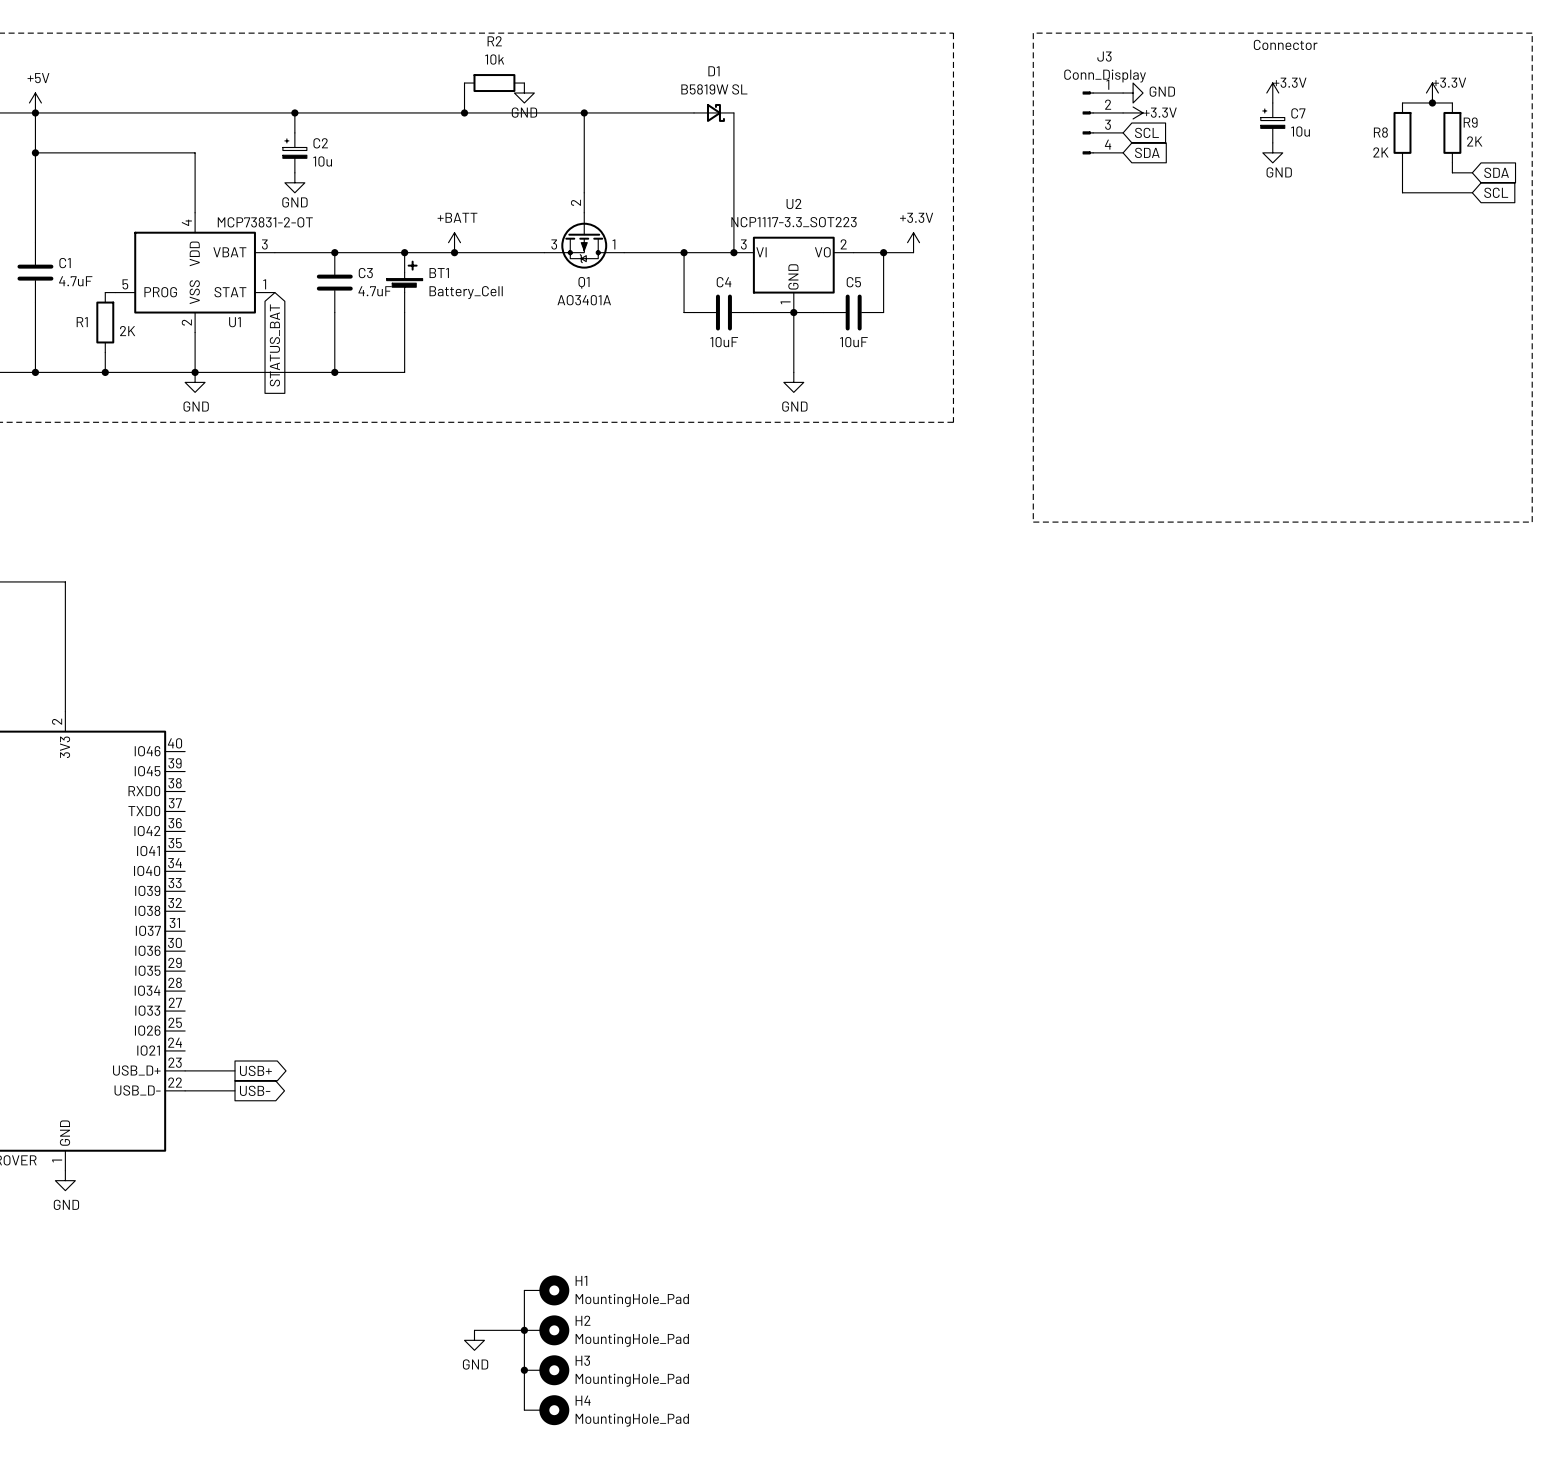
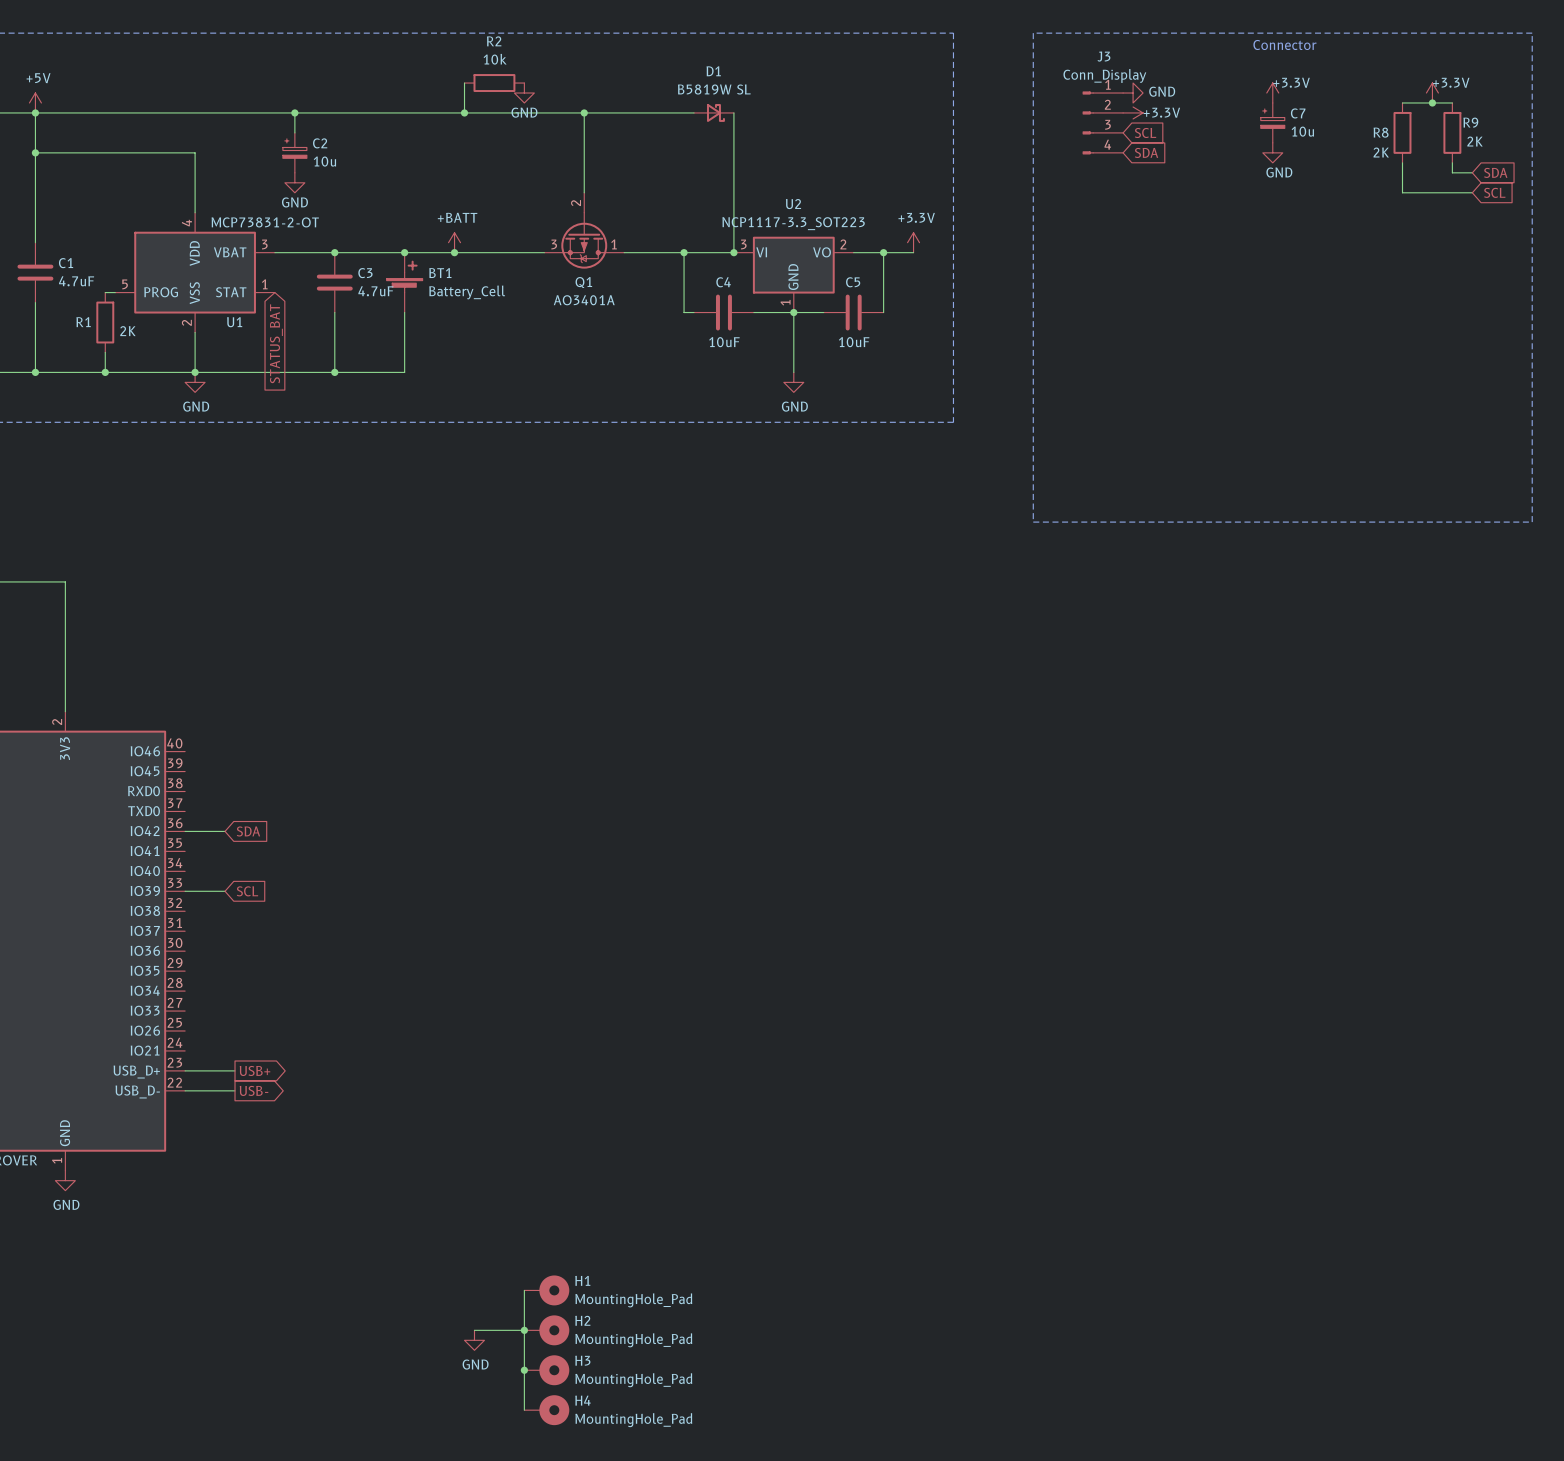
wire: none -> (185, 831) (225, 831)
global label: none -> SDA (248, 831)
wire: none -> (185, 891) (225, 891)
global label: none -> SCL (247, 891)

